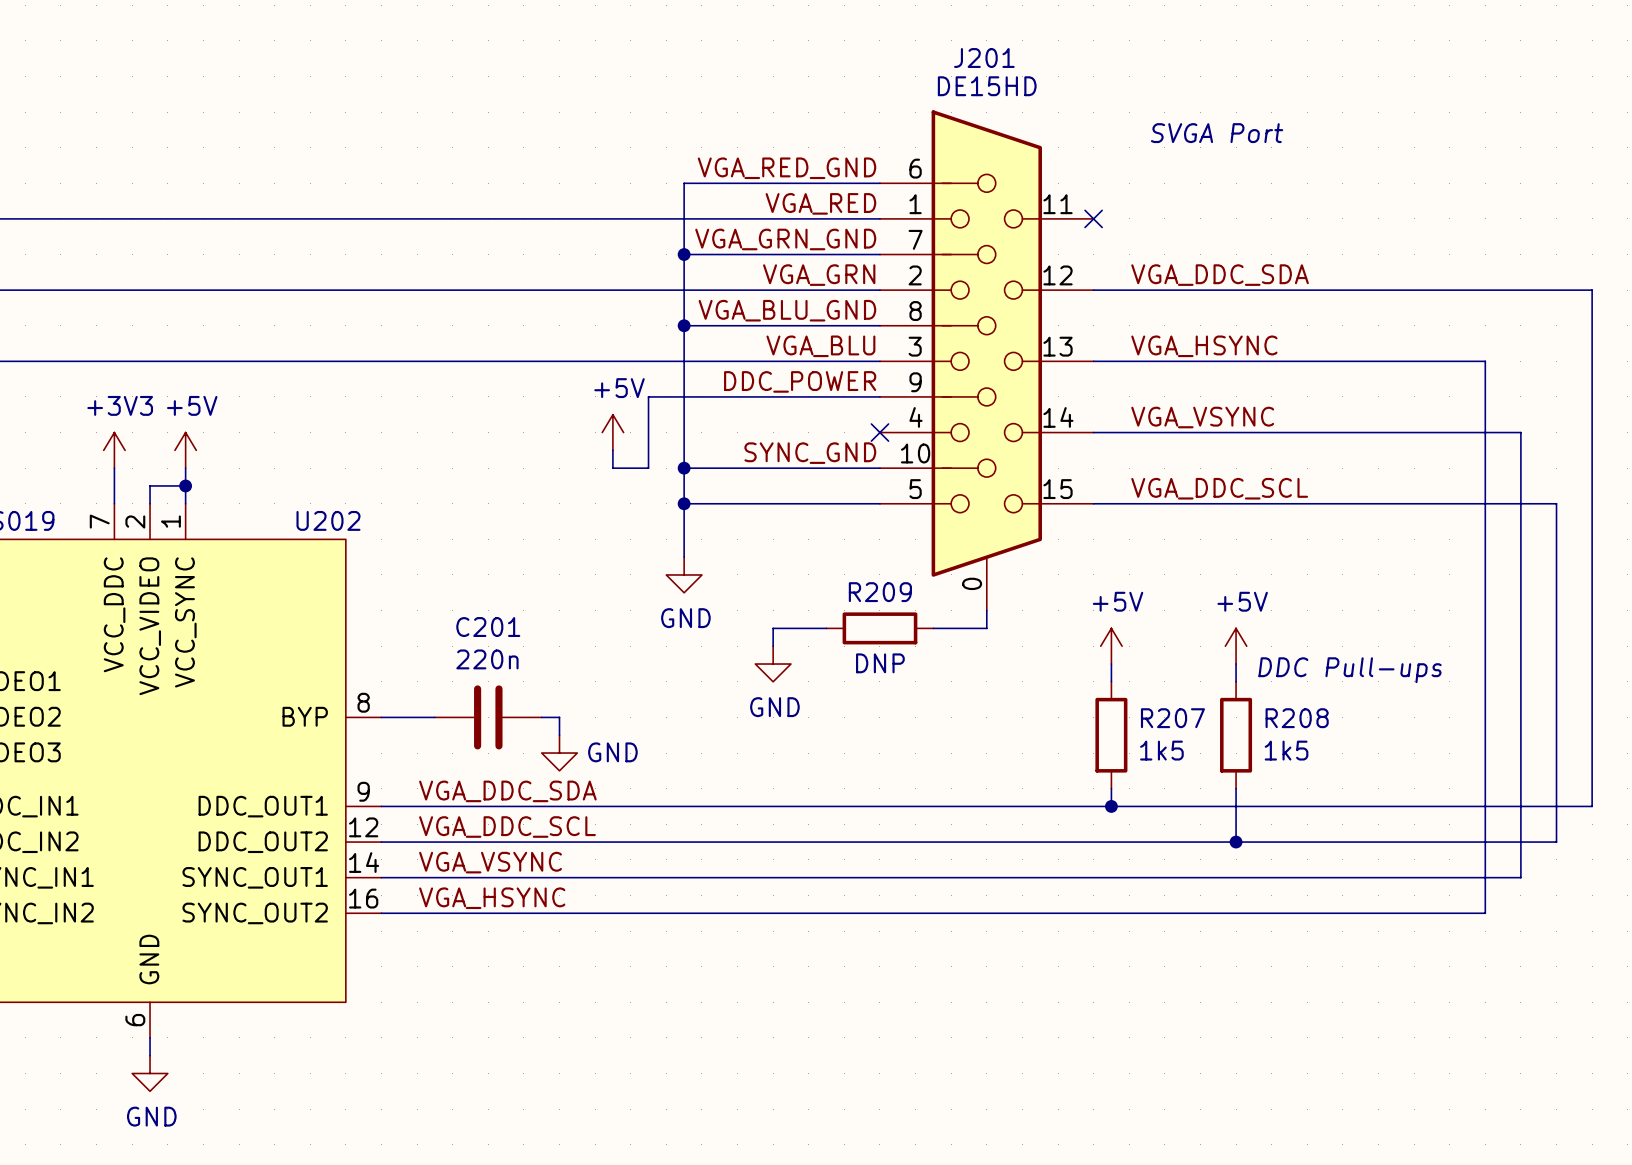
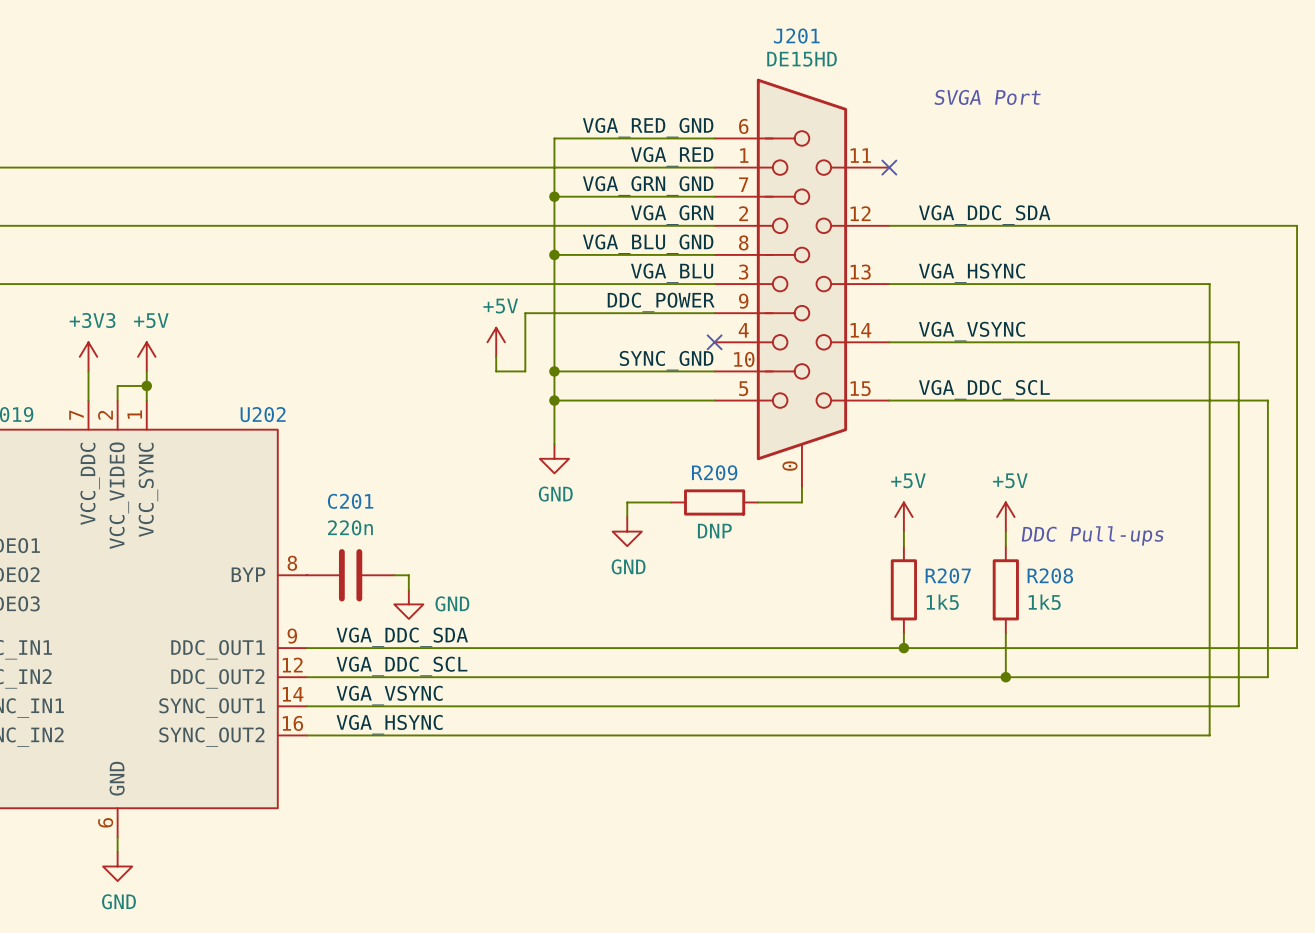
C201 position: (488, 717) -> (350, 575)
wire: (541, 717) (559, 717) (559, 735) -> (394, 575) (408, 575) (408, 589)
power symbol position: GND (559, 753) -> GND (408, 604)

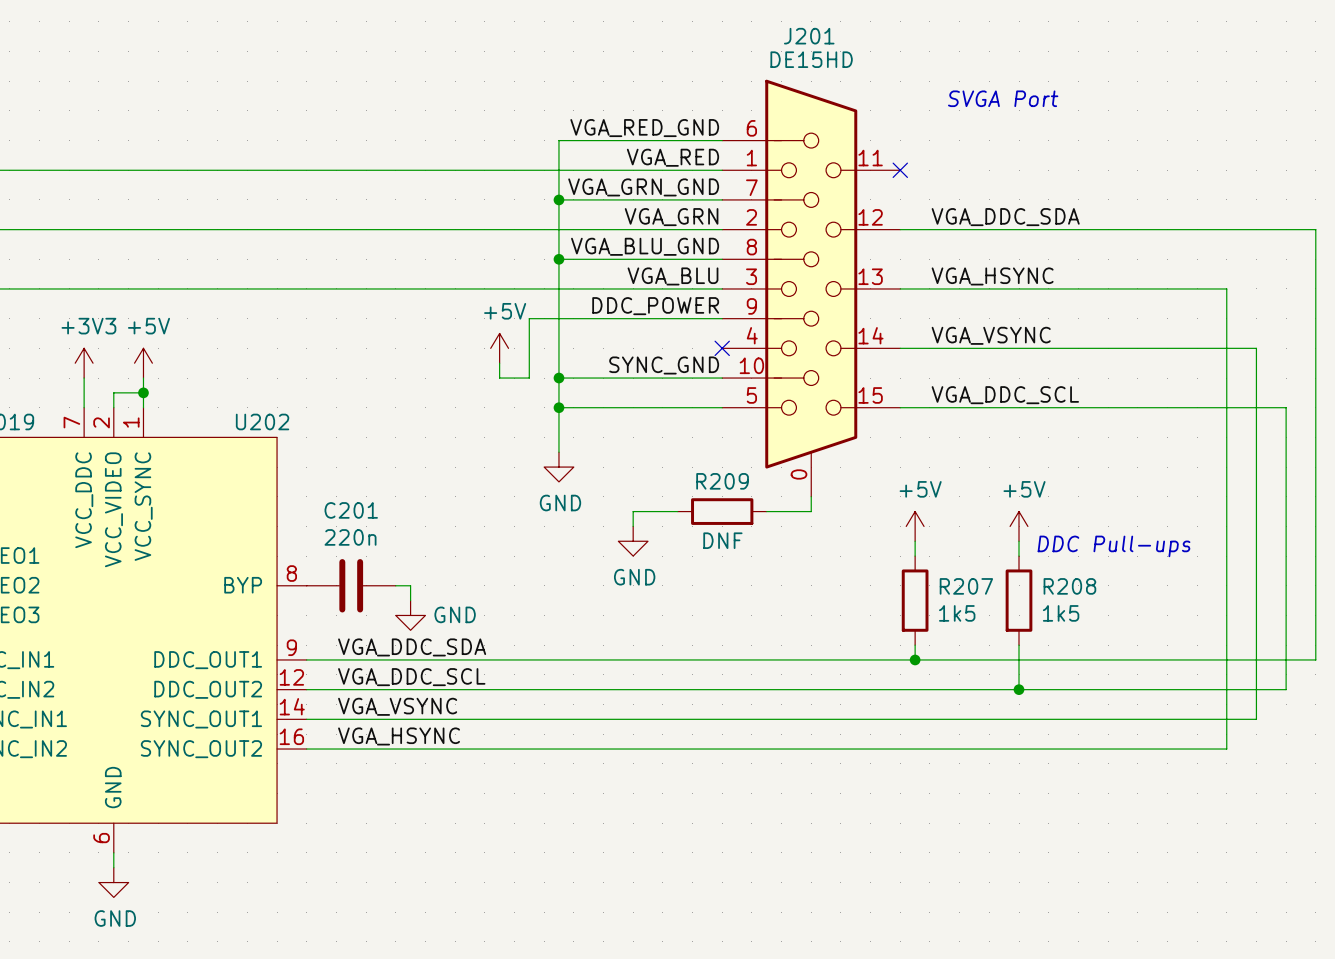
R209 value: DNP (714, 531) -> DNF (722, 540)

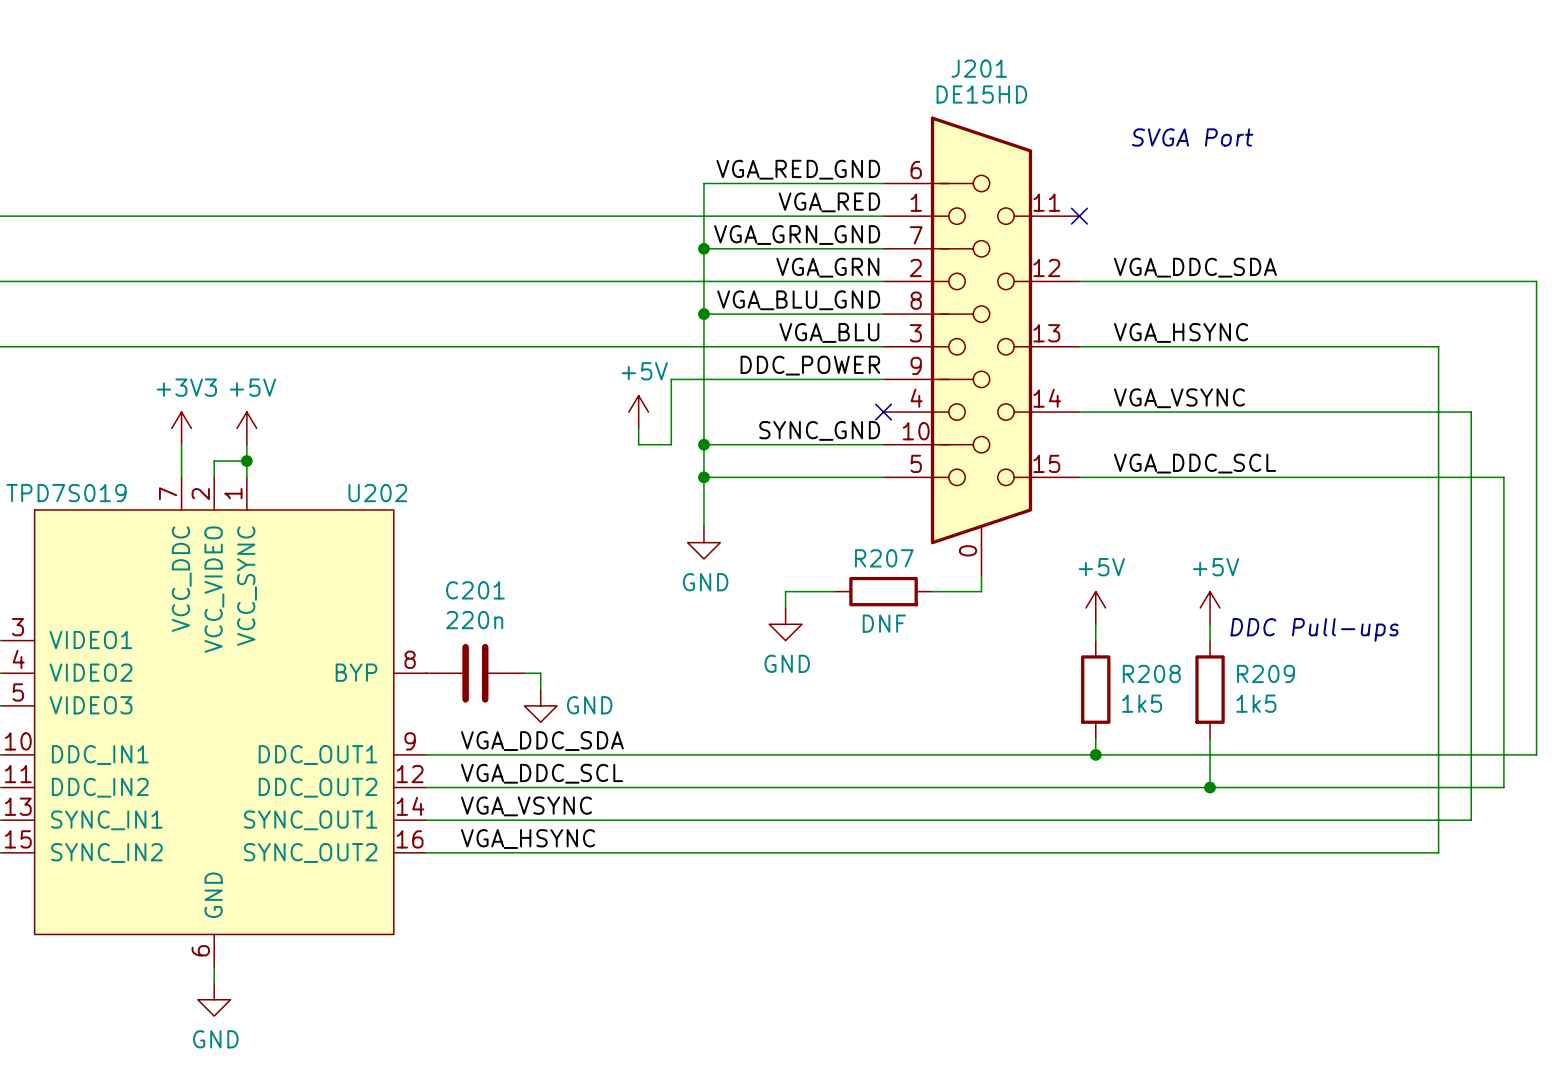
R209 name: R209 (722, 481) -> R207 (884, 558)
R207 name: R207 (966, 586) -> R208 (1151, 673)
R208 name: R208 (1069, 586) -> R209 (1266, 673)

